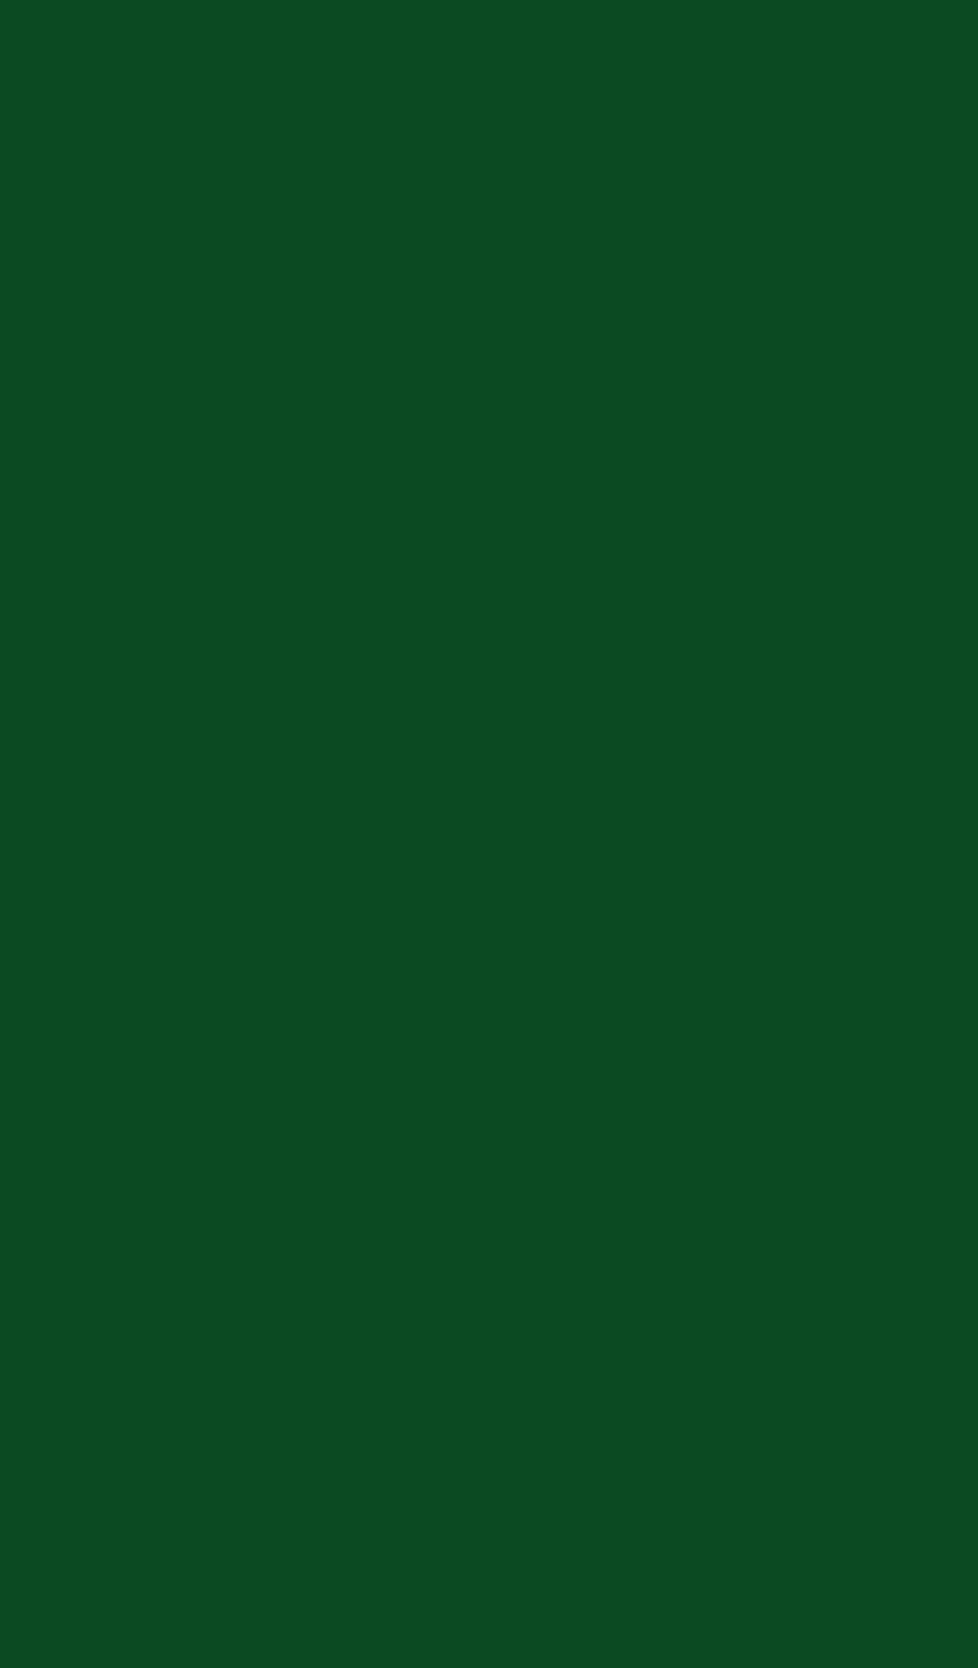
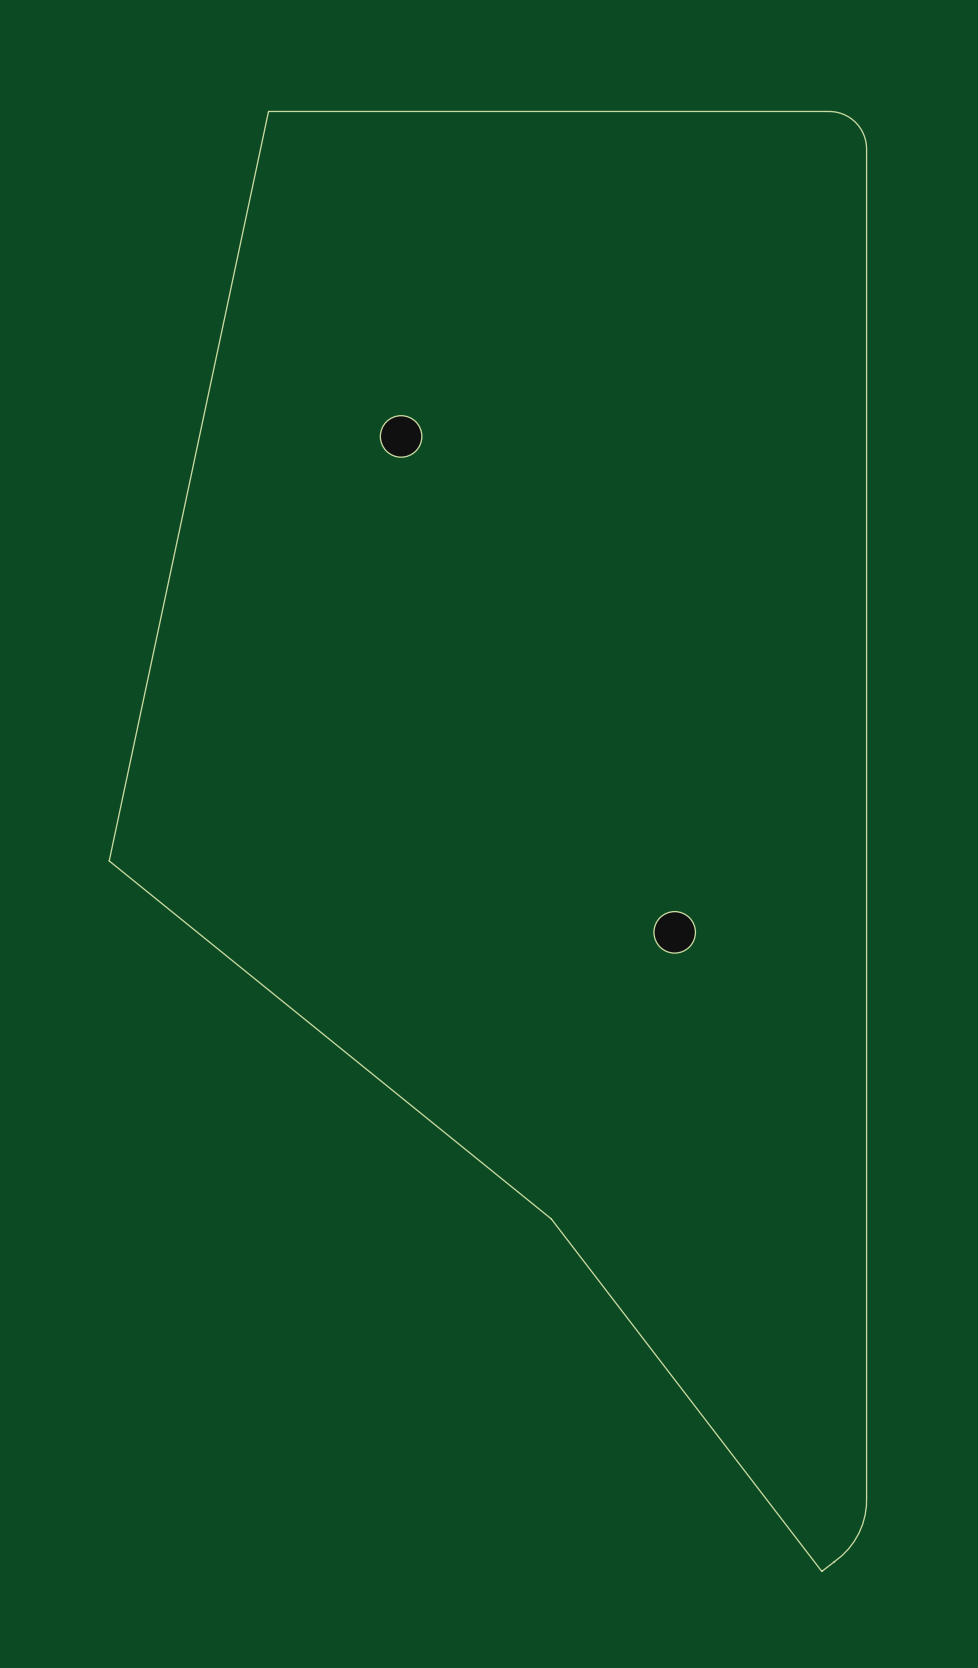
part: none -> (401, 436)
part: none -> (674, 932)
board edge: none -> (821, 1571) (551, 1219) (109, 861) (268, 111) (831, 111) (851, 118) (864, 136) (866, 148) (866, 1505) (862, 1524) (854, 1541) (841, 1555) (821, 1571)

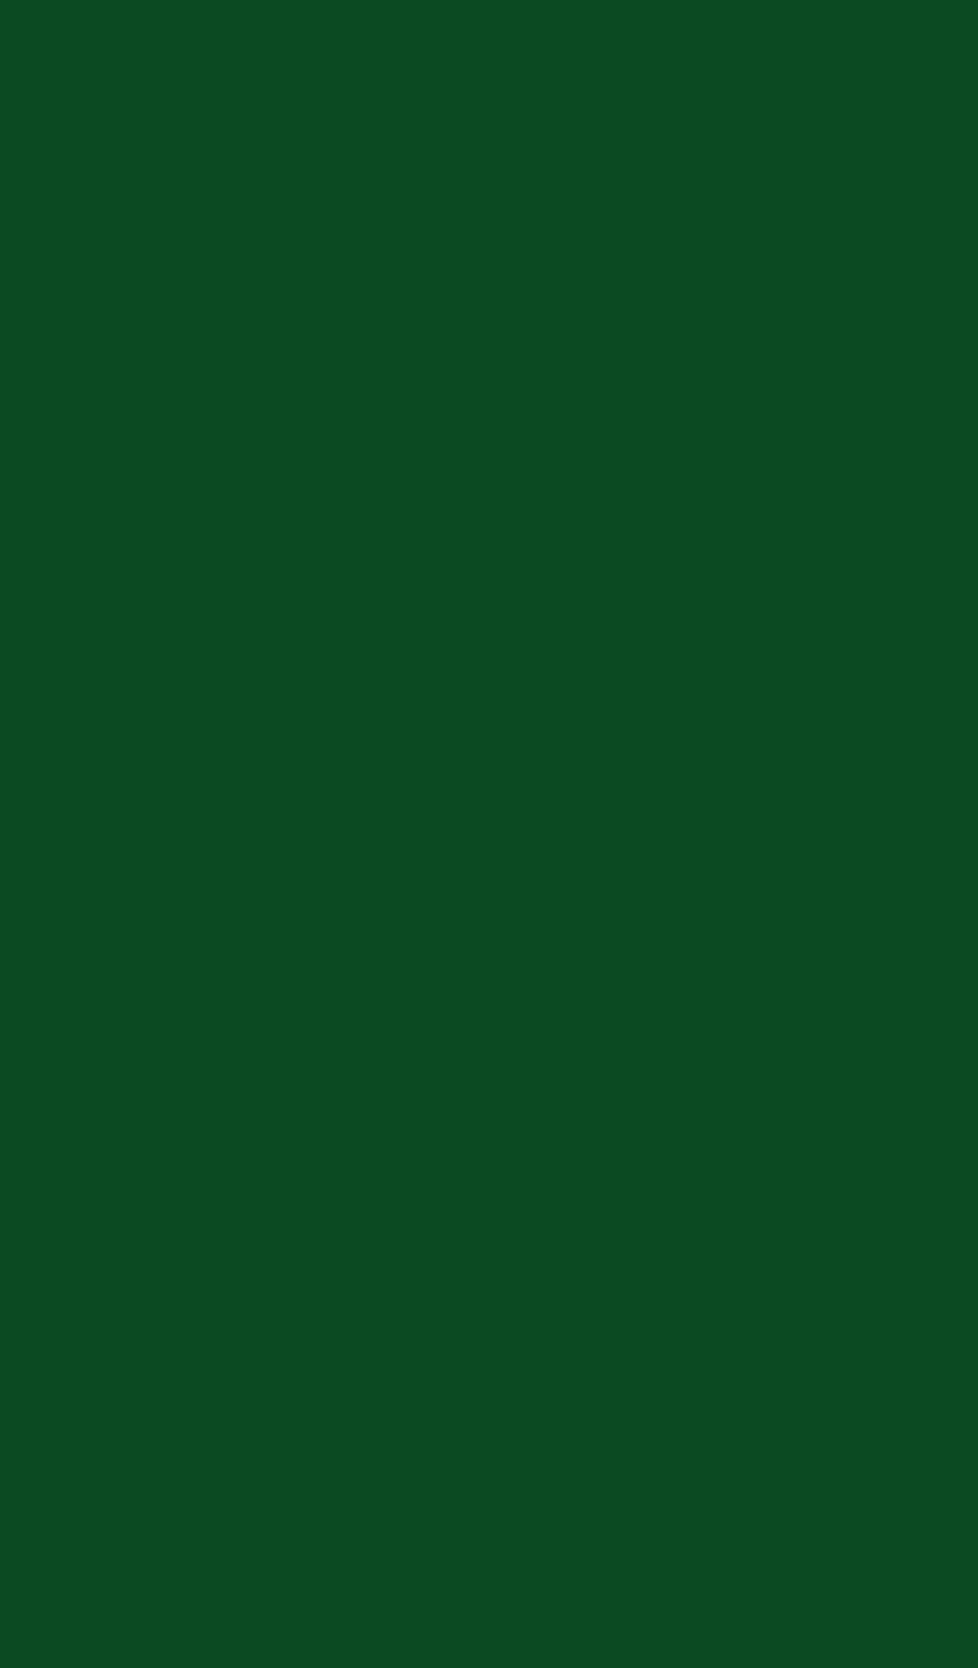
part: (401, 436) -> none
part: (674, 932) -> none
board edge: (821, 1571) (551, 1219) (109, 861) (268, 111) (831, 111) (851, 118) (864, 136) (866, 148) (866, 1505) (862, 1524) (854, 1541) (841, 1555) (821, 1571) -> none

